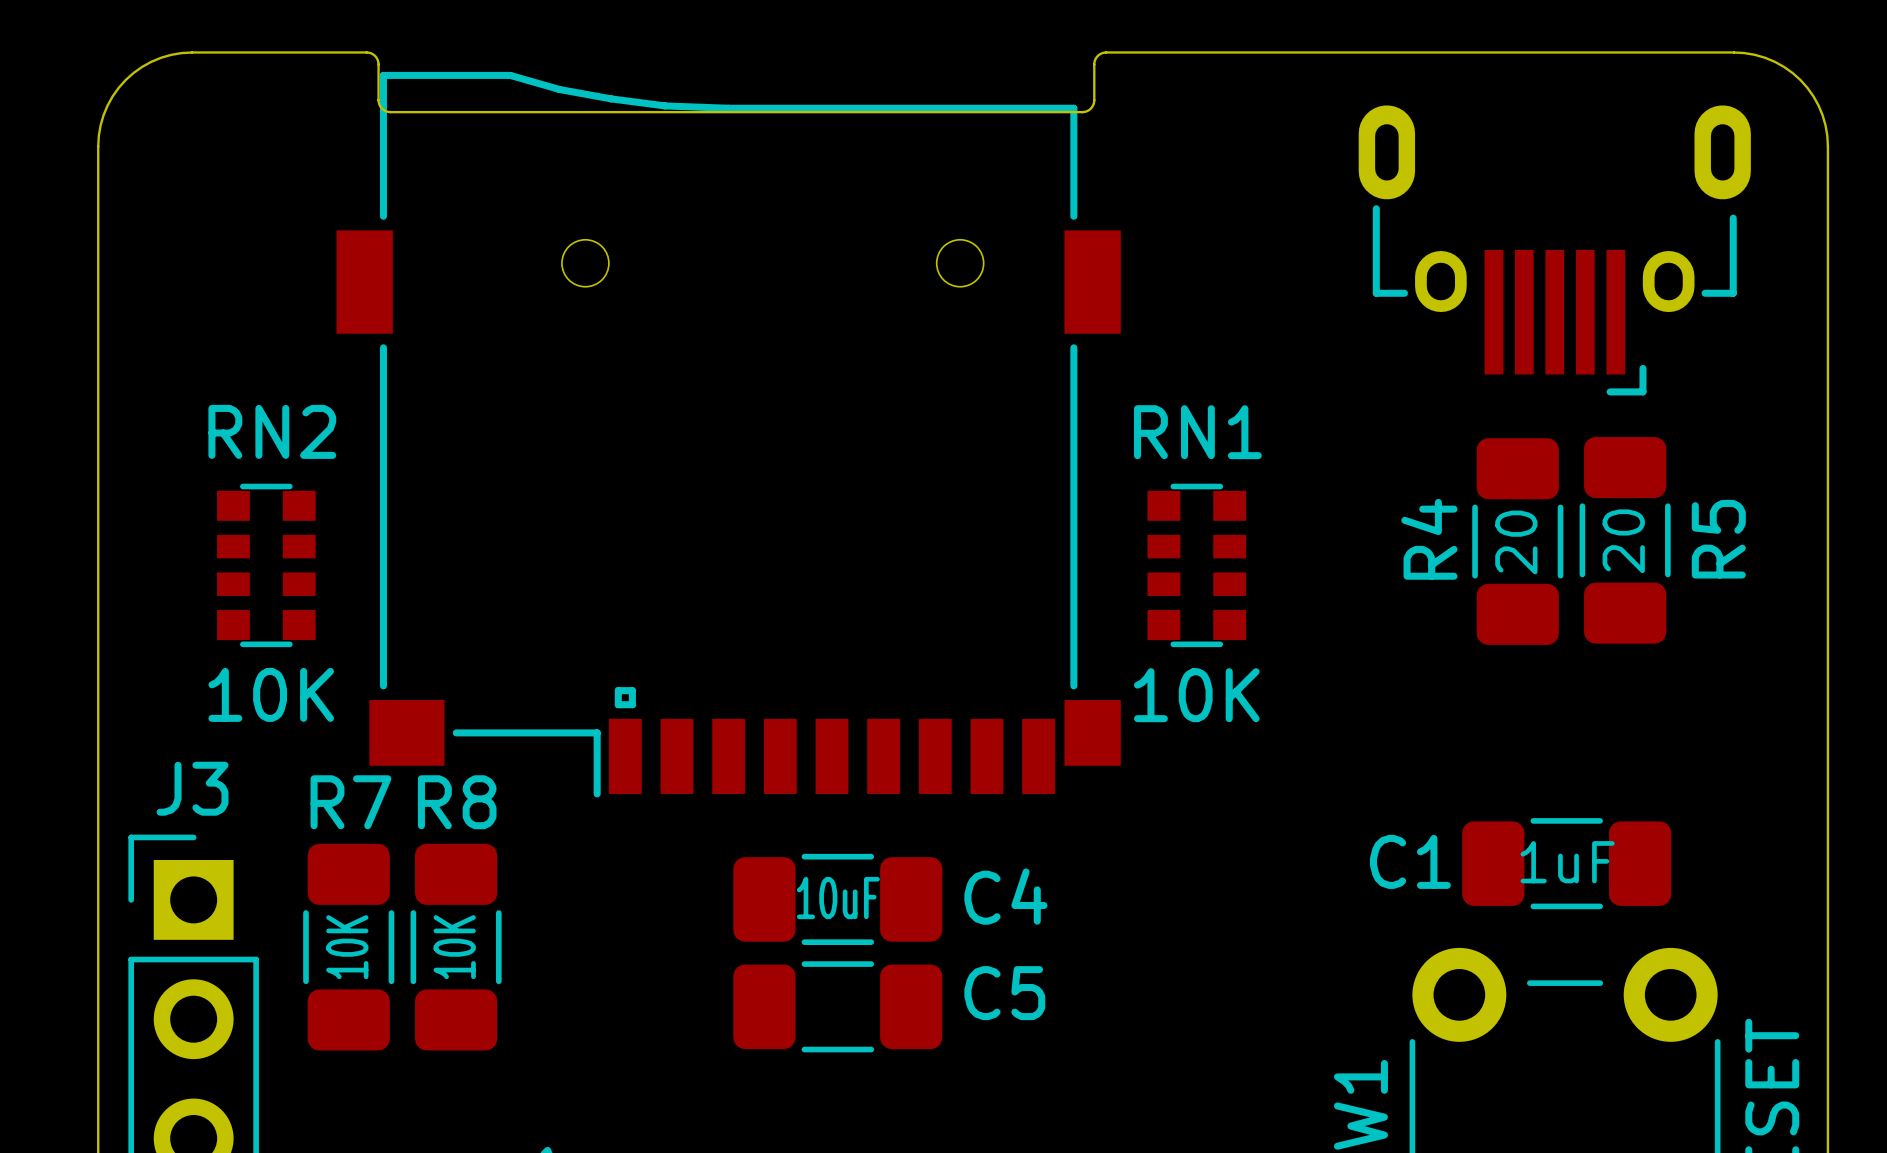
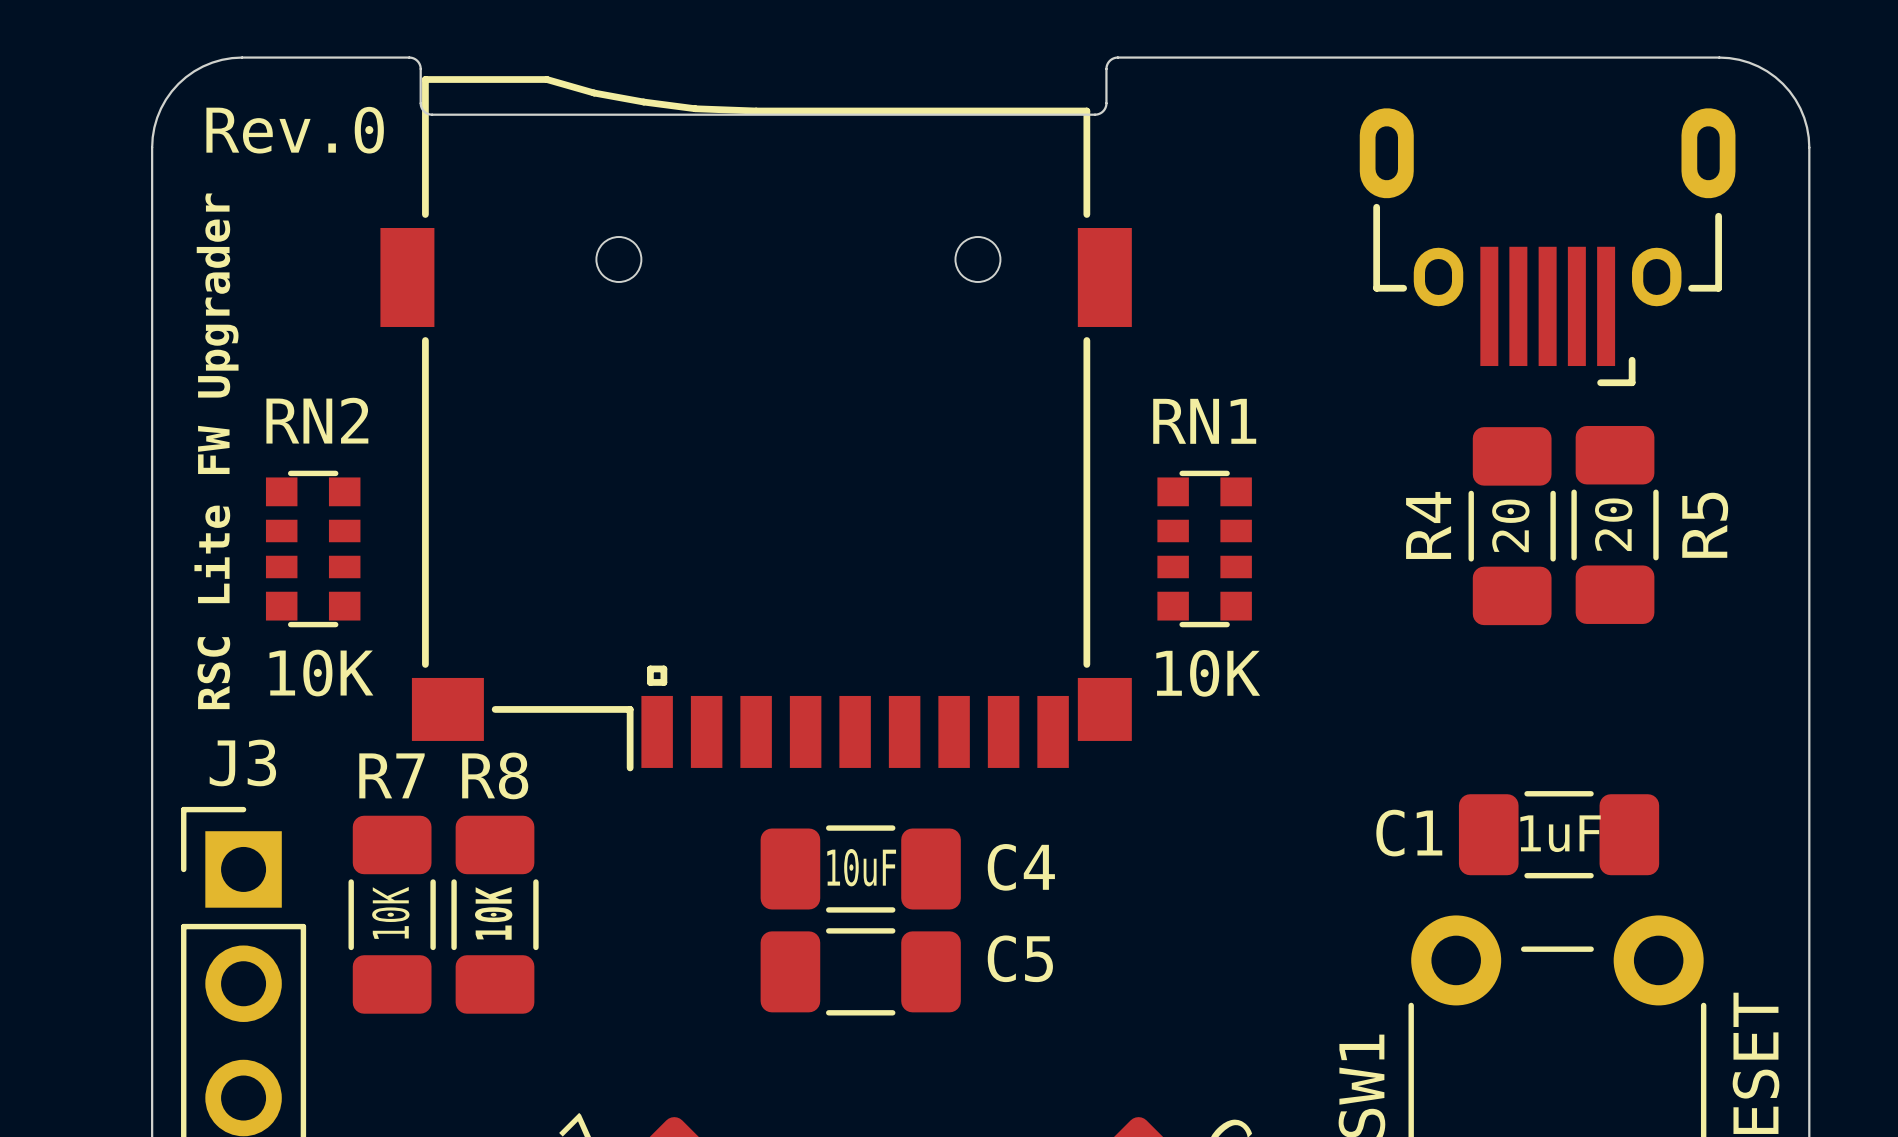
text: none -> Rev.0 (295, 130)
text: none -> RSC Lite FW Upgrader (216, 451)

